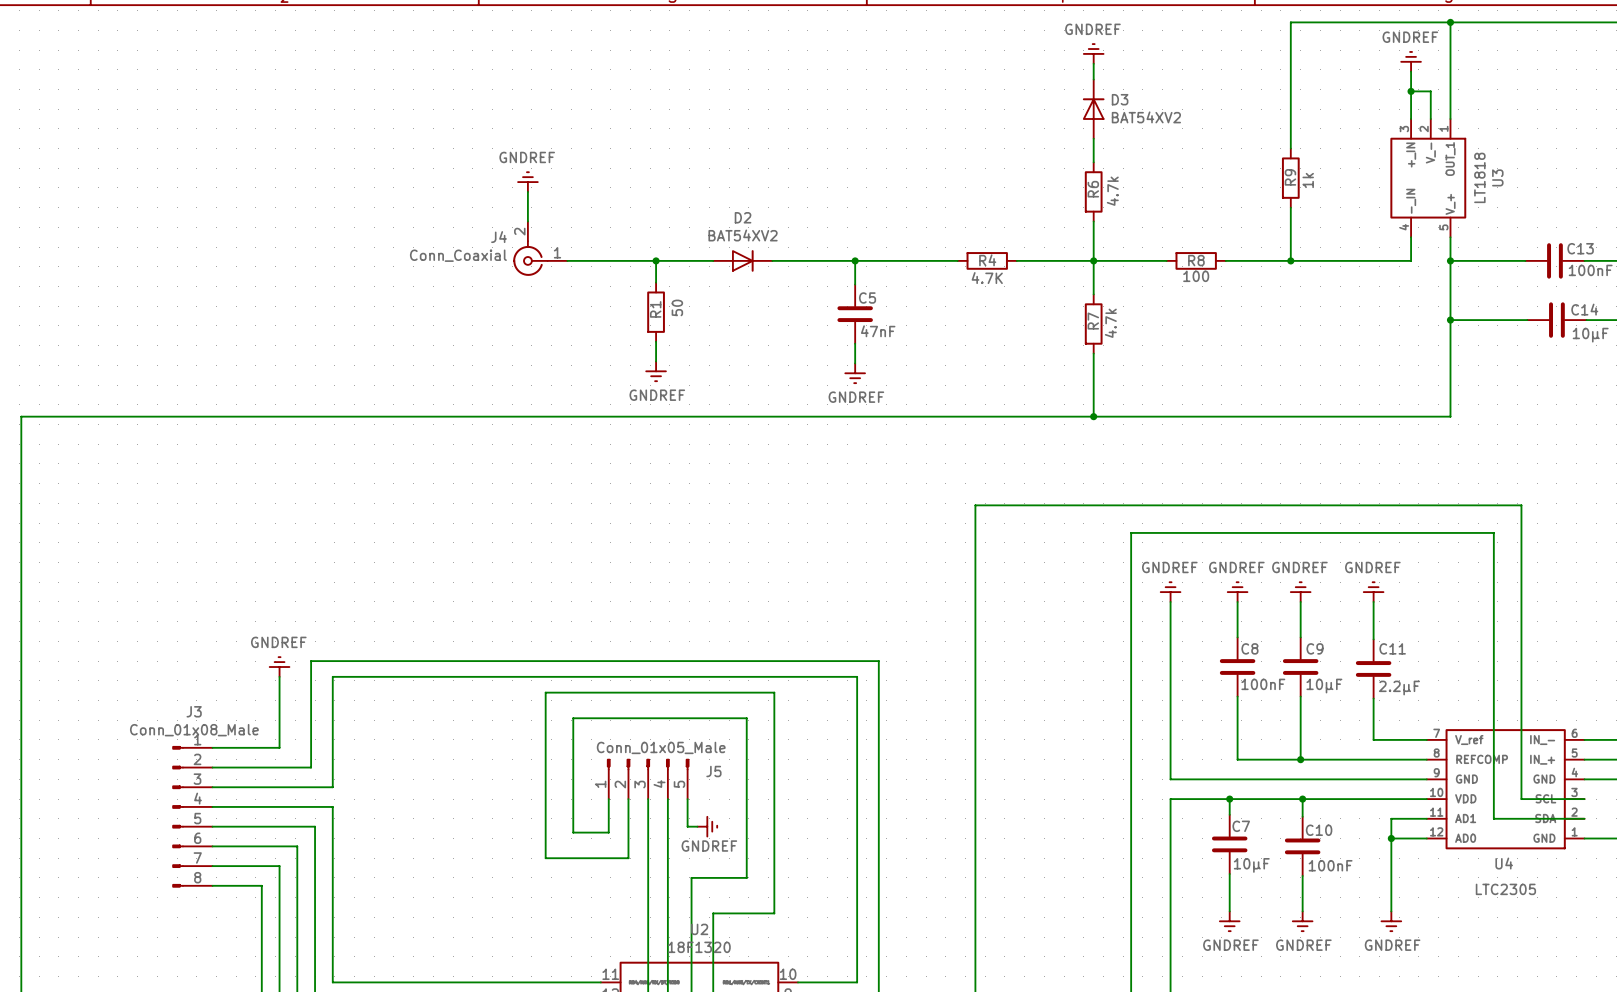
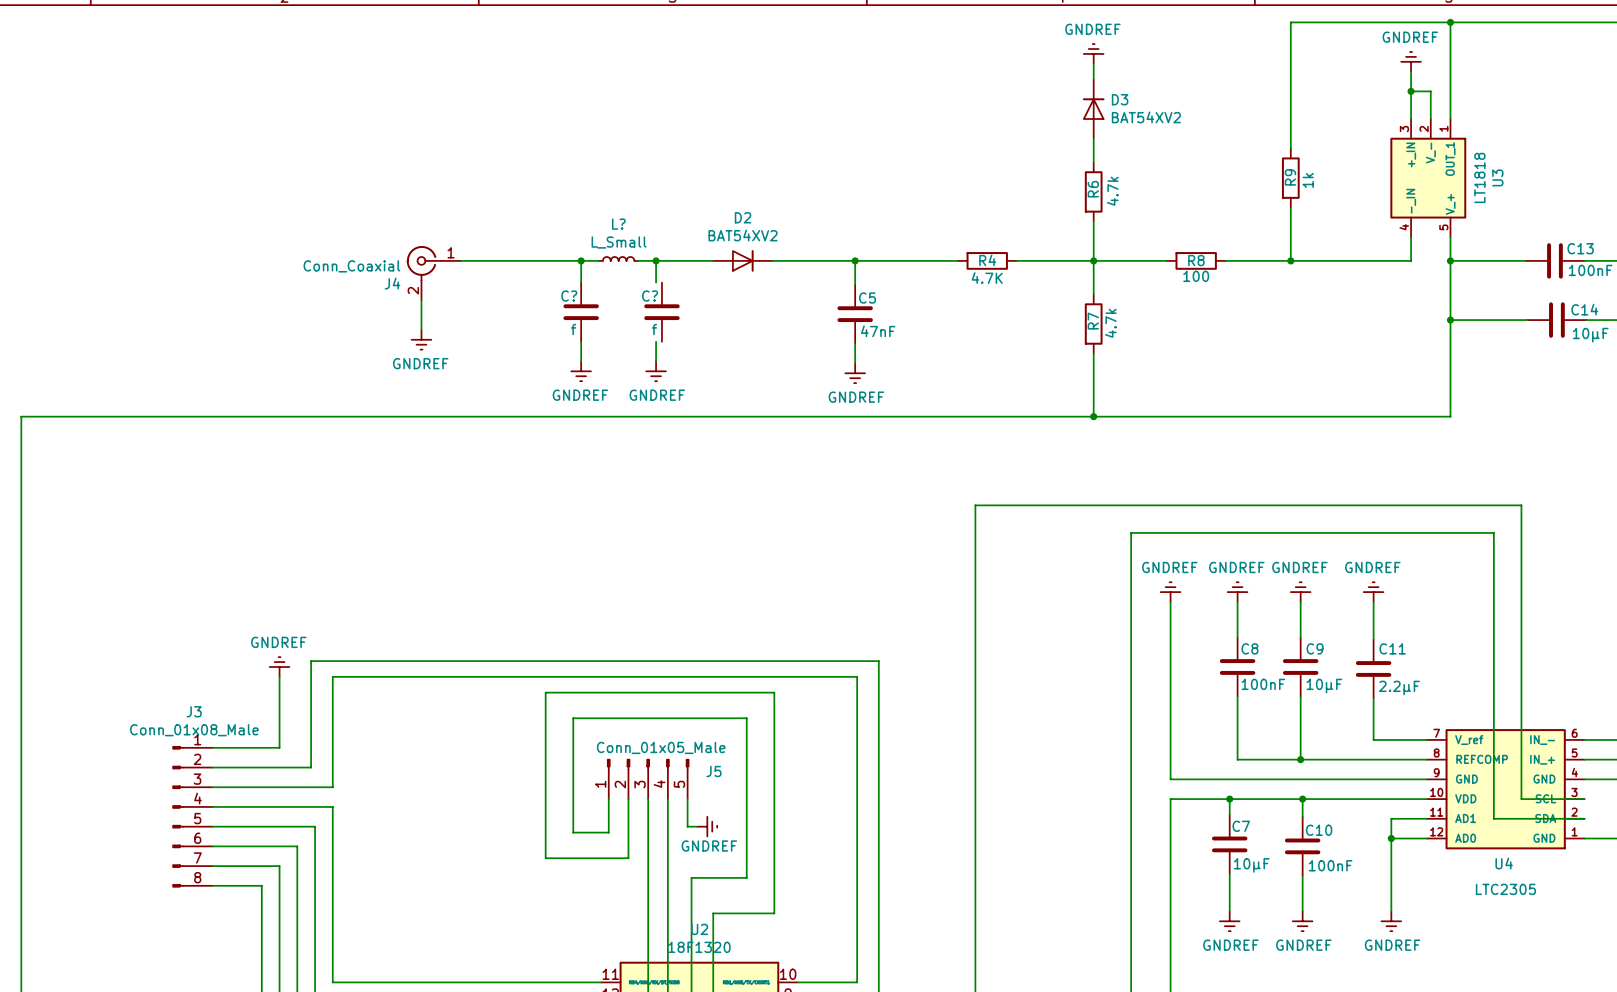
power symbol: GNDREF (527, 182) -> none
wire: (527, 191) (527, 221) -> (421, 300) (421, 329)
J4 position: (540, 248) -> (433, 273)
J4 flip: as is (530, 258) -> up-down (423, 263)
L?: none -> L_Small (618, 258)
wire: none -> (460, 260) (567, 260)
wire: none -> (581, 260) (581, 282)
junction: none -> (581, 260)
wire: (598, 260) (638, 260) -> none
C?: none -> f (581, 312)
R1: 50 (656, 312) -> none
C?: none -> f (661, 312)
power symbol: none -> GNDREF (421, 339)
wire: none -> (581, 341) (581, 361)
power symbol: none -> GNDREF (581, 371)

